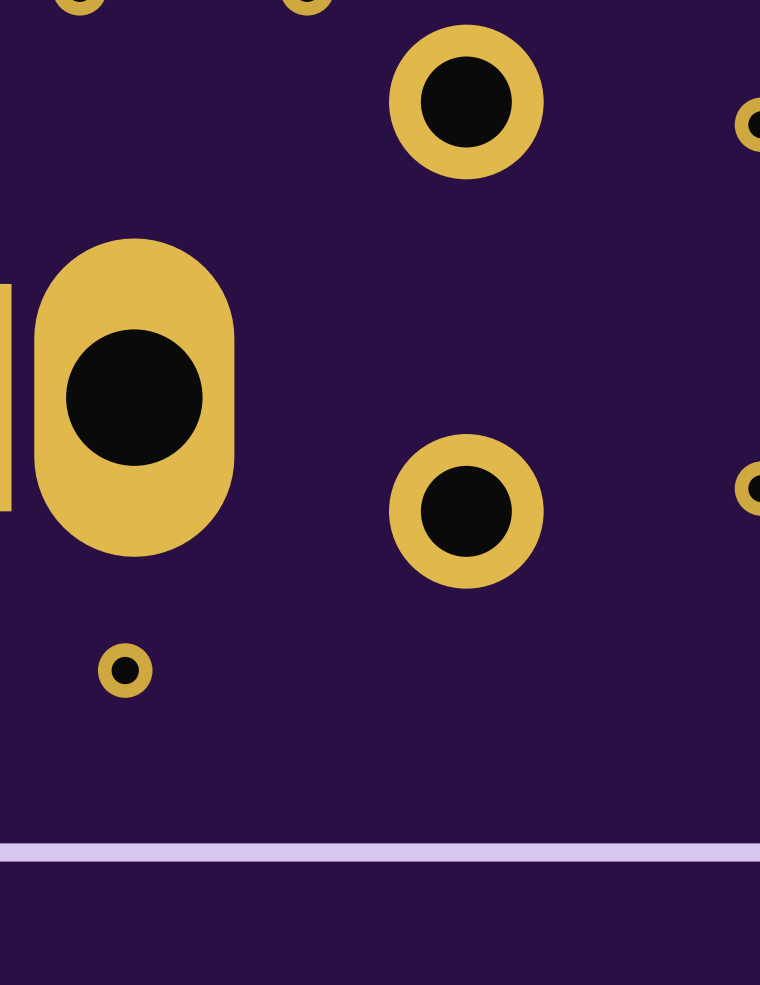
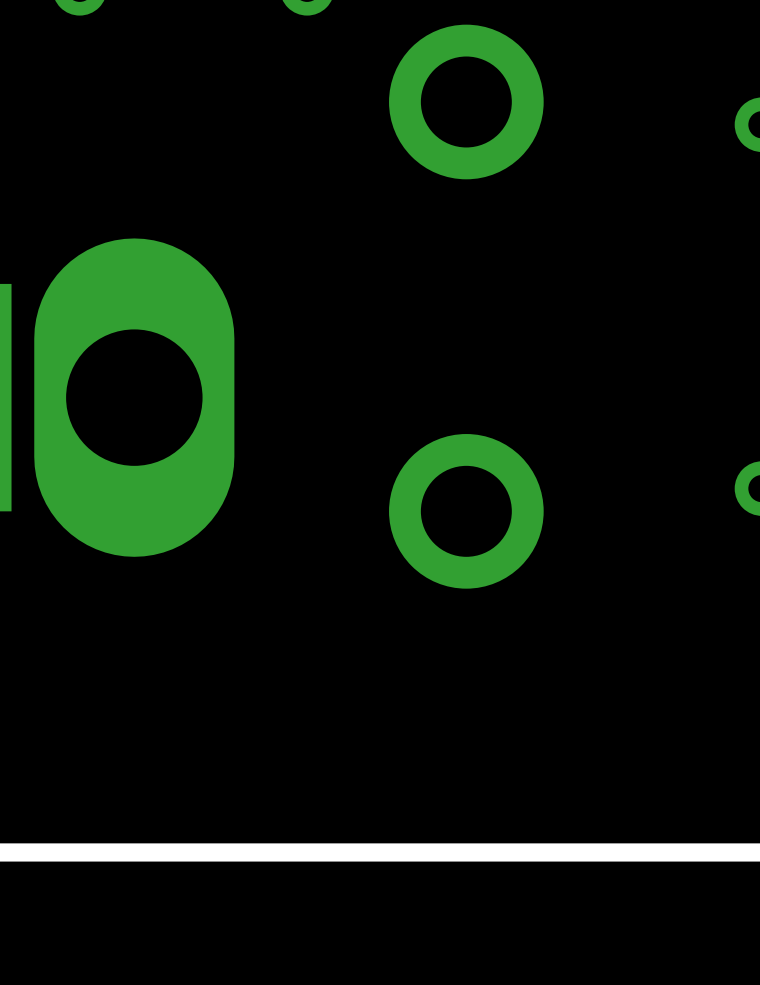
via: (125, 670) -> none

